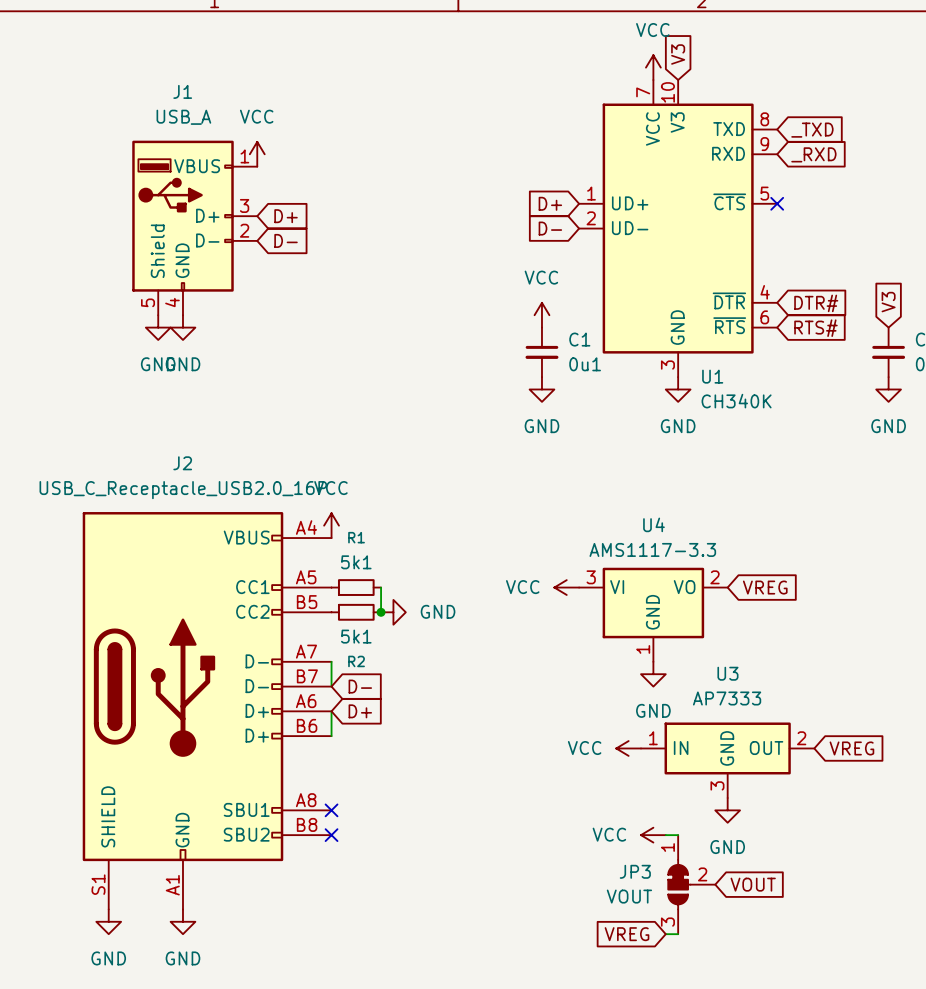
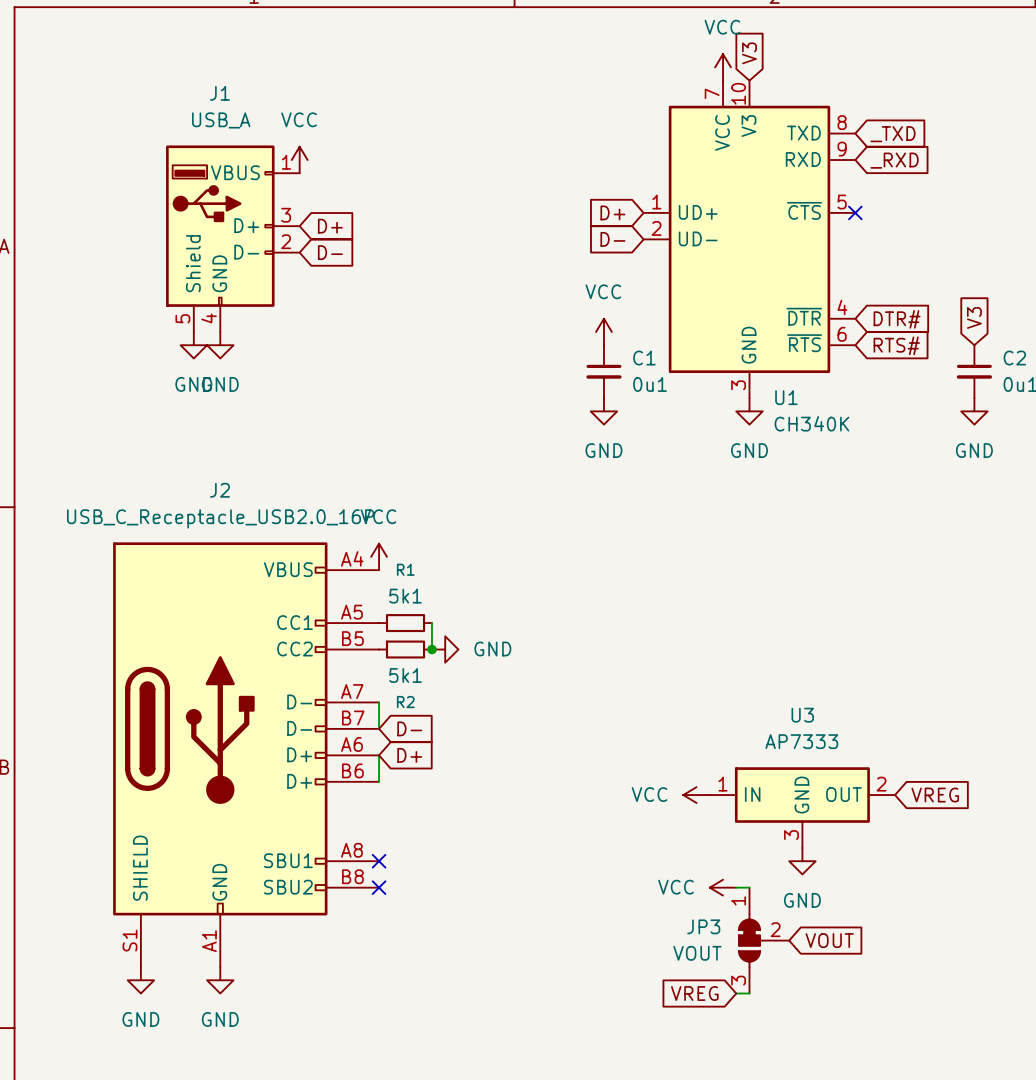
power symbol: VCC (566, 587) -> none
global label: VREG (765, 587) -> none
U4: AMS1117-3.3 (653, 614) -> none
power symbol: GND (653, 674) -> none

